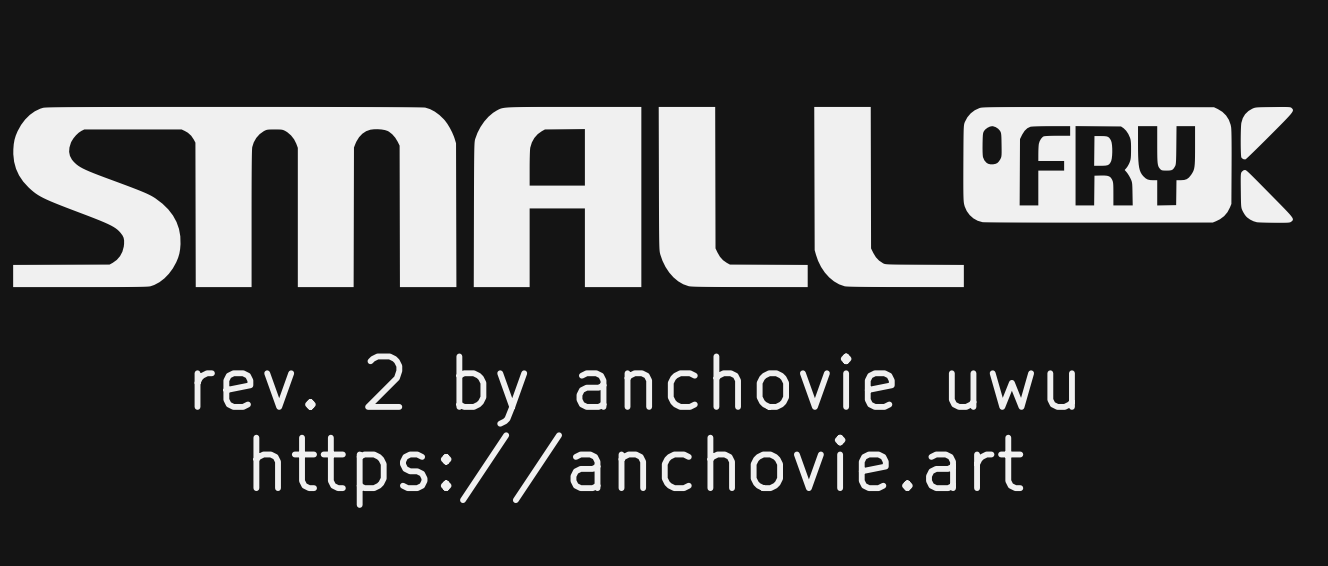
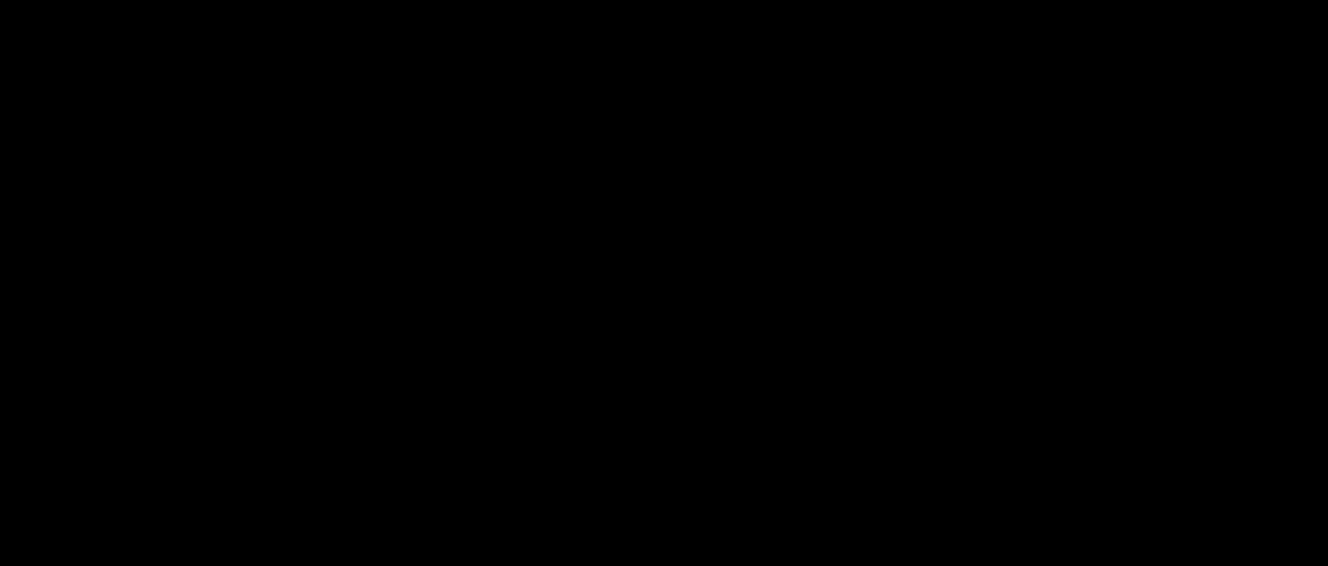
drawing: [13, 106, 1293, 288] -> none
text: rev. 2 by anchovie uwu (634, 390) -> none
text: https://anchovie.art (638, 470) -> none

